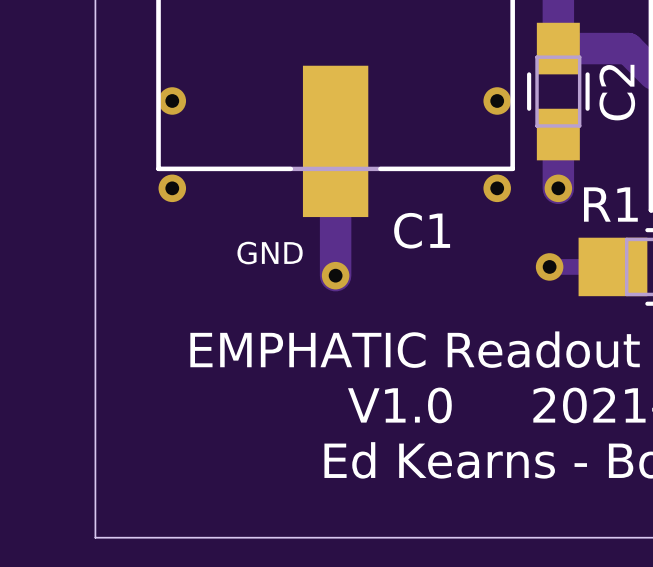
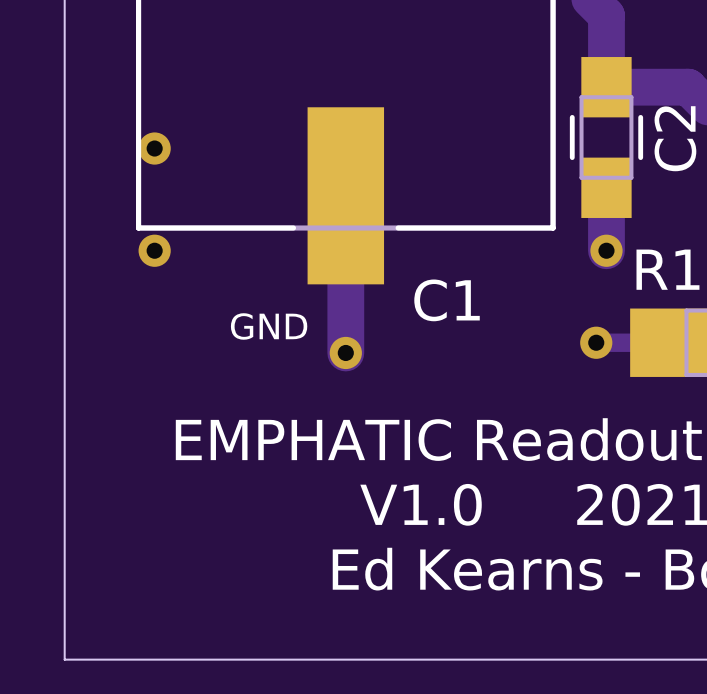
via: (497, 100) -> none
via: (497, 188) -> none

